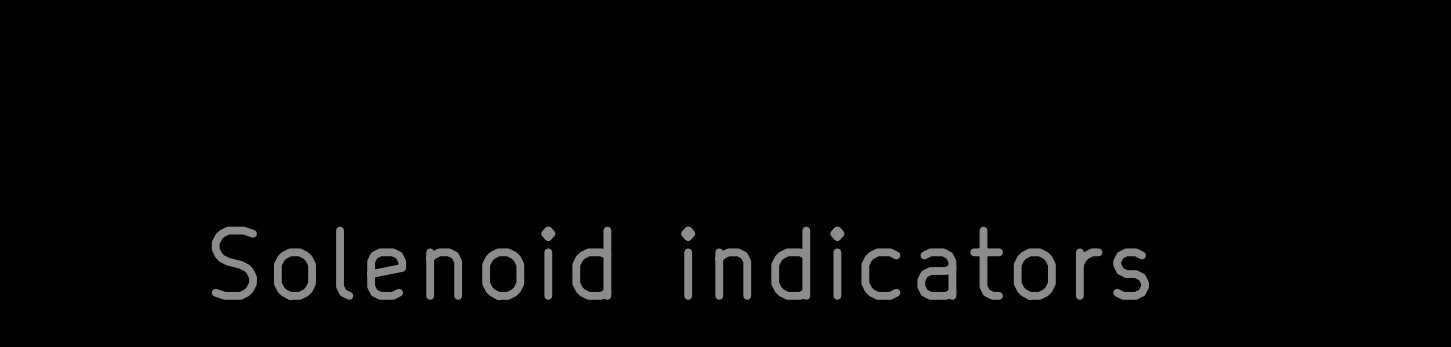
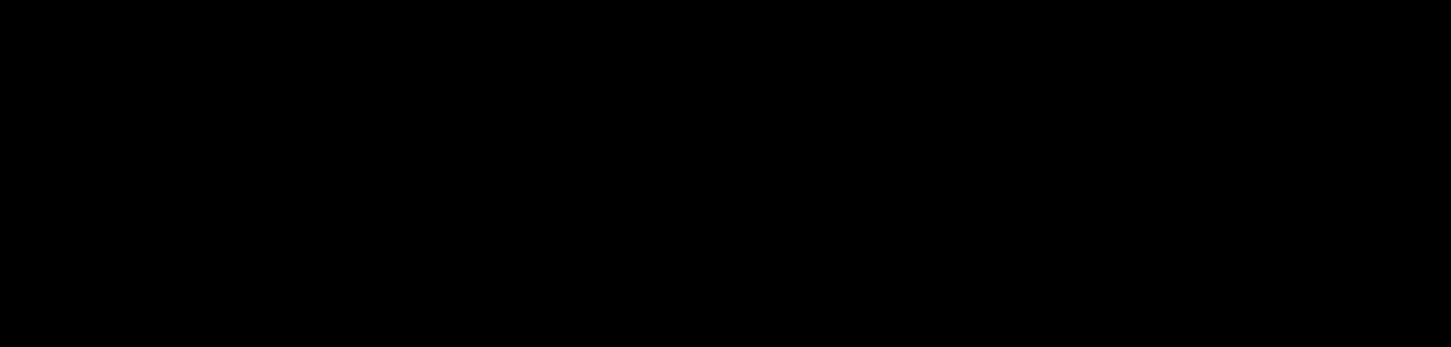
text: Solenoid indicators (680, 263) -> none

